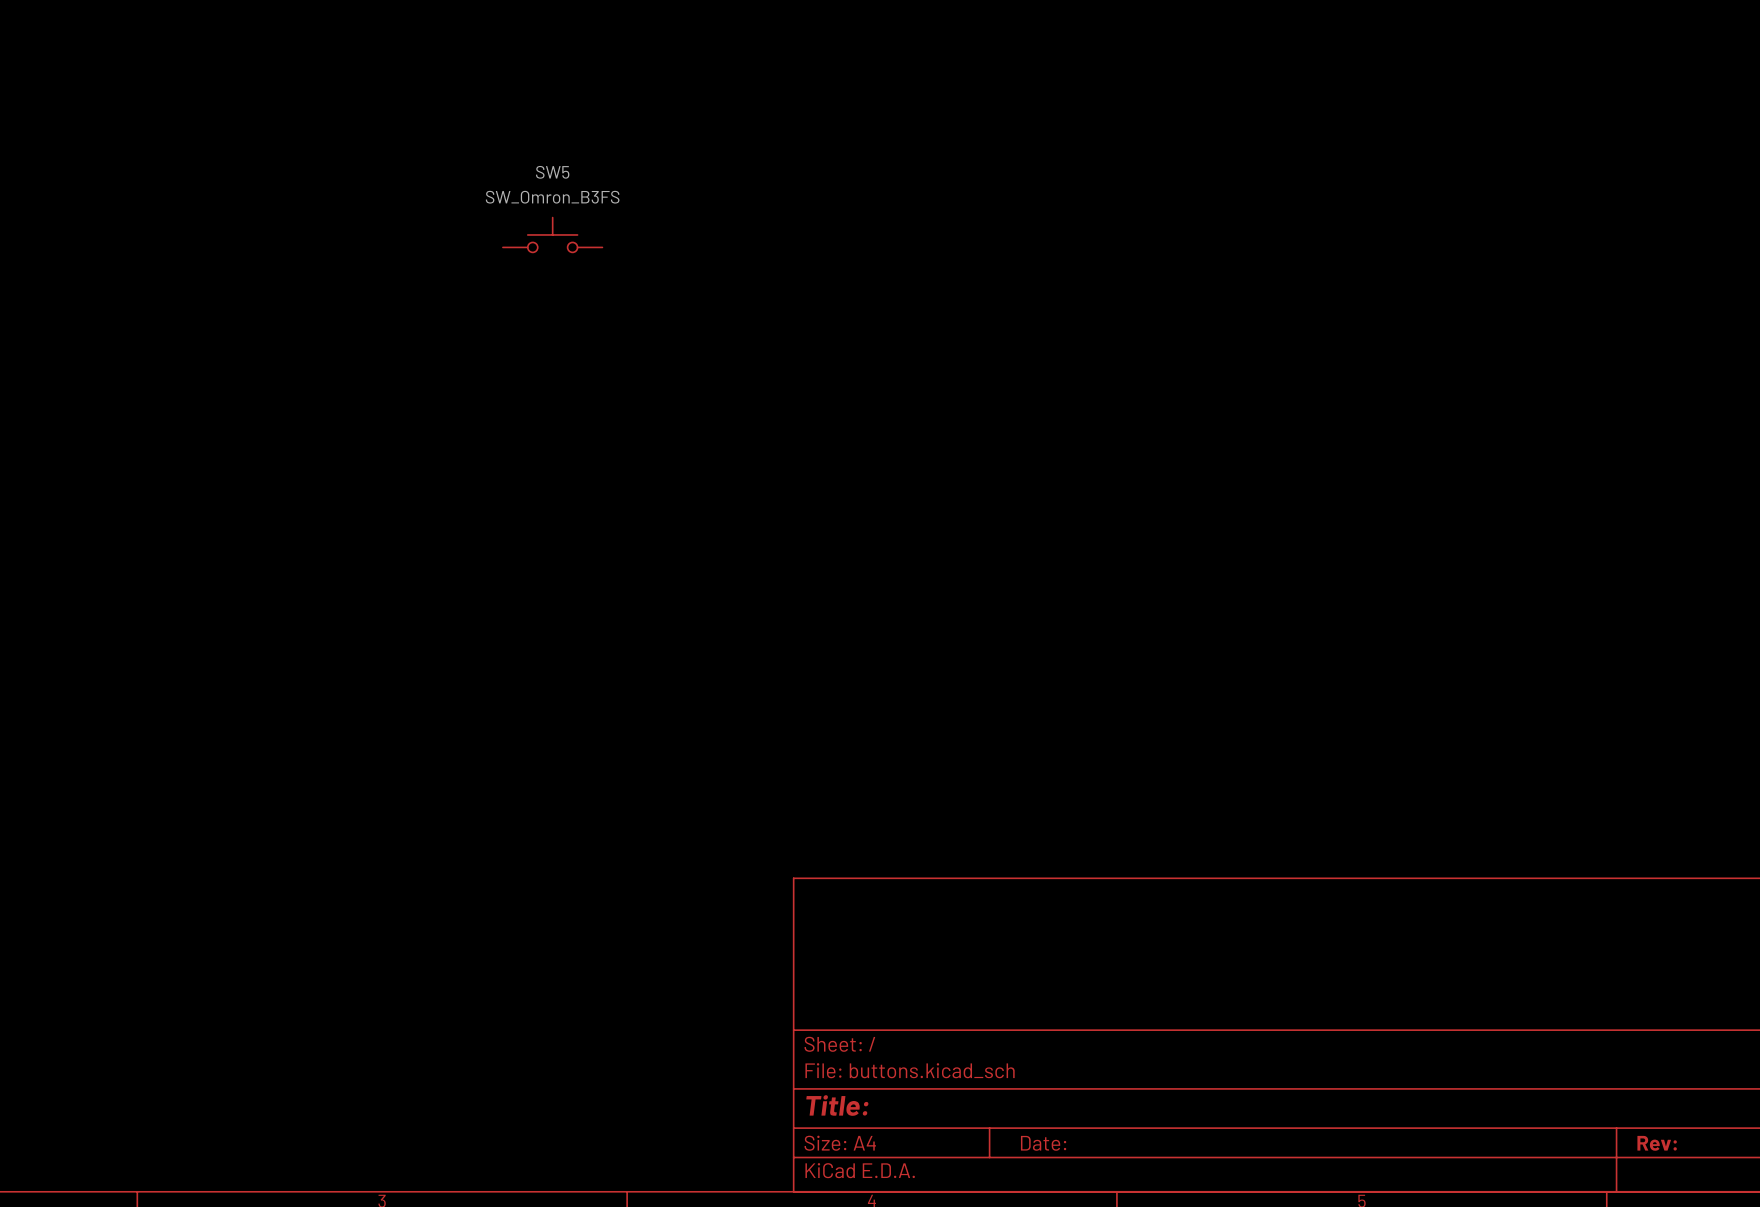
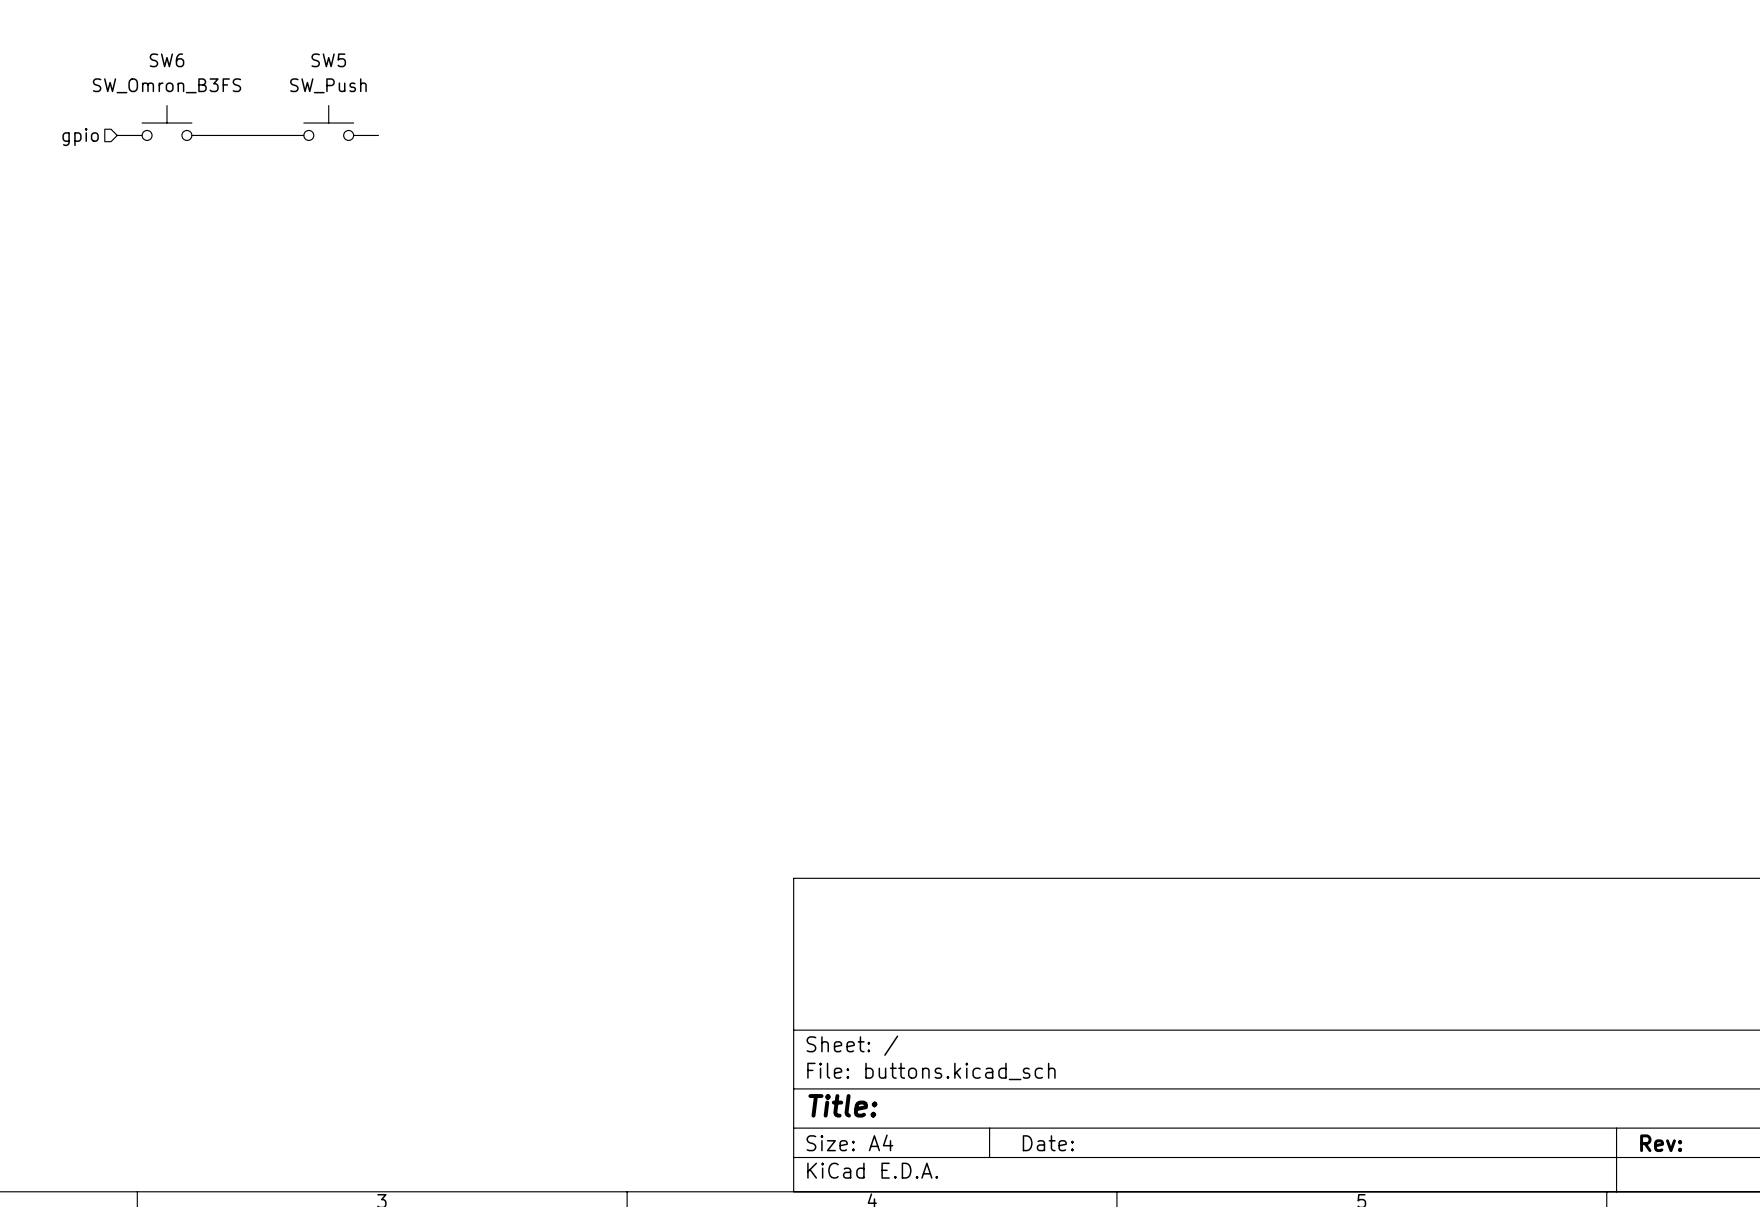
SW6: none -> SW_Omron_B3FS (166, 123)
wire: none -> (216, 135) (278, 135)
hierarchical label: none -> gpio (80, 137)
SW5 value: SW_Omron_B3FS (552, 197) -> SW_Push (328, 85)
SW5 position: (552, 234) -> (328, 123)

